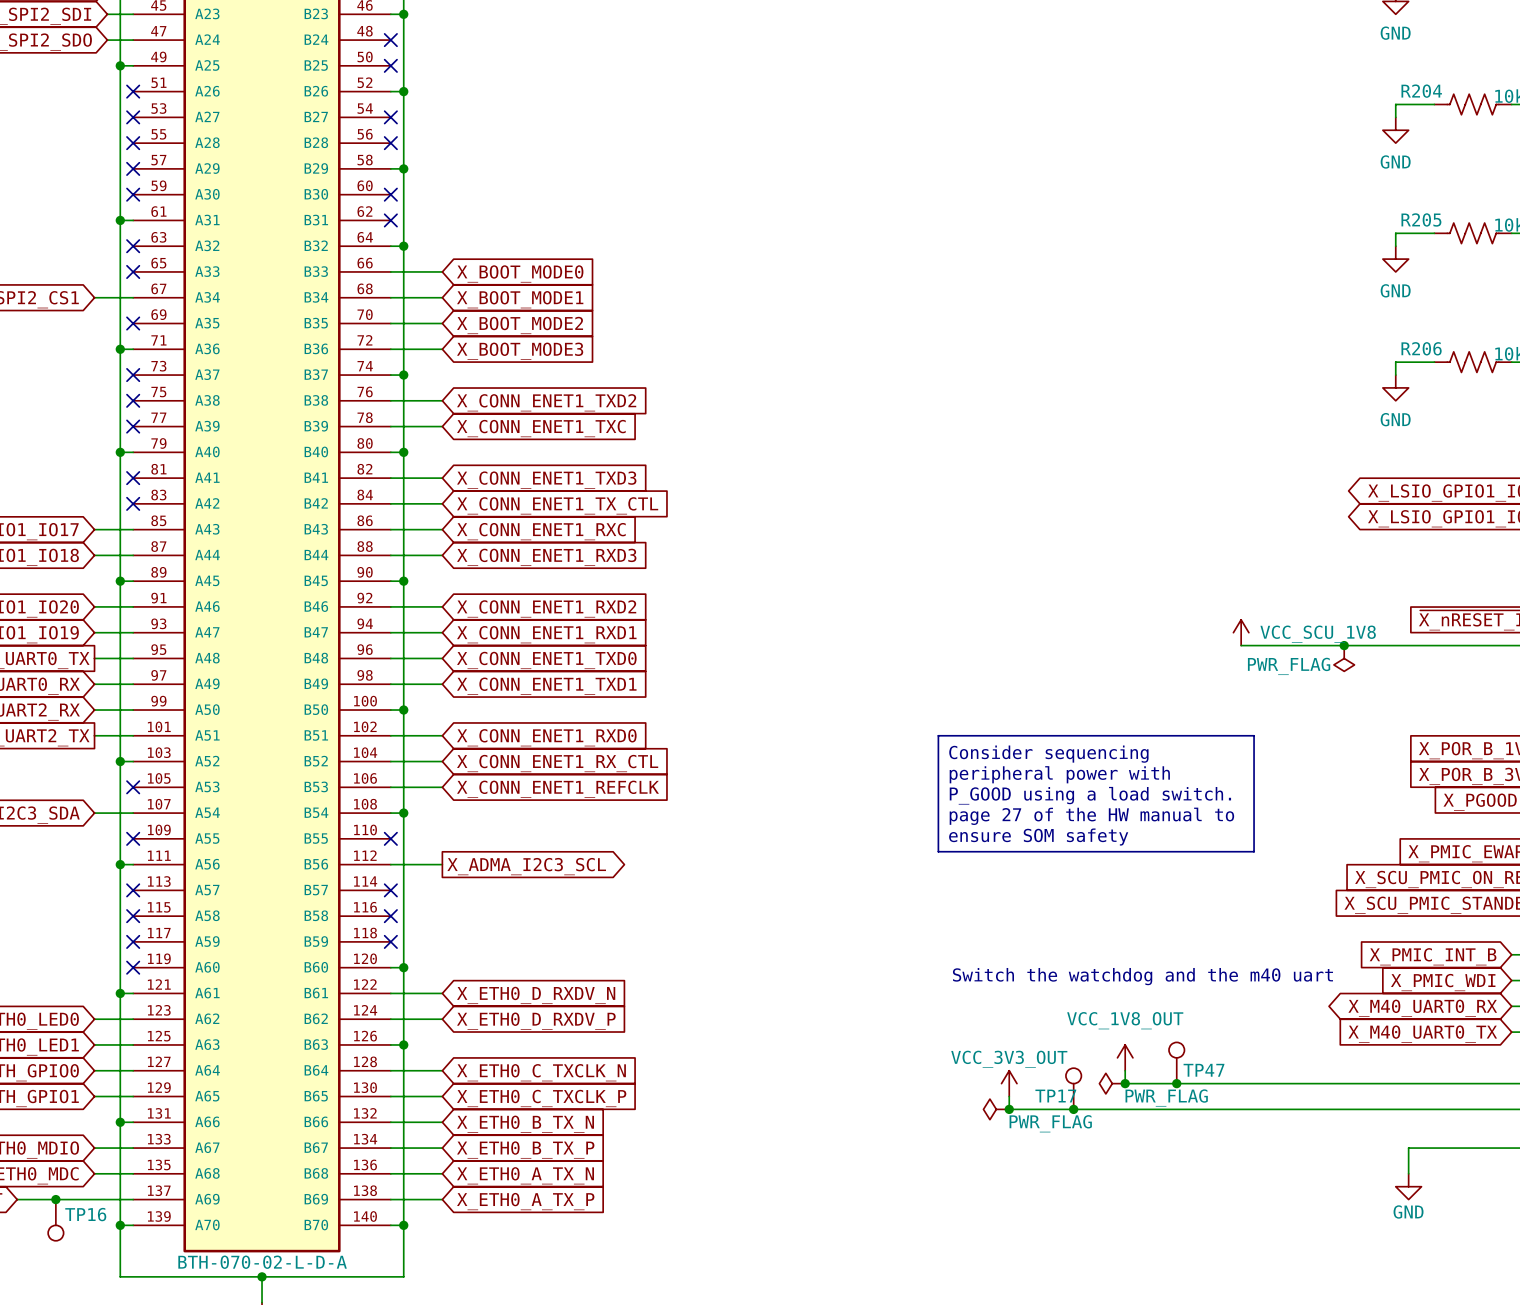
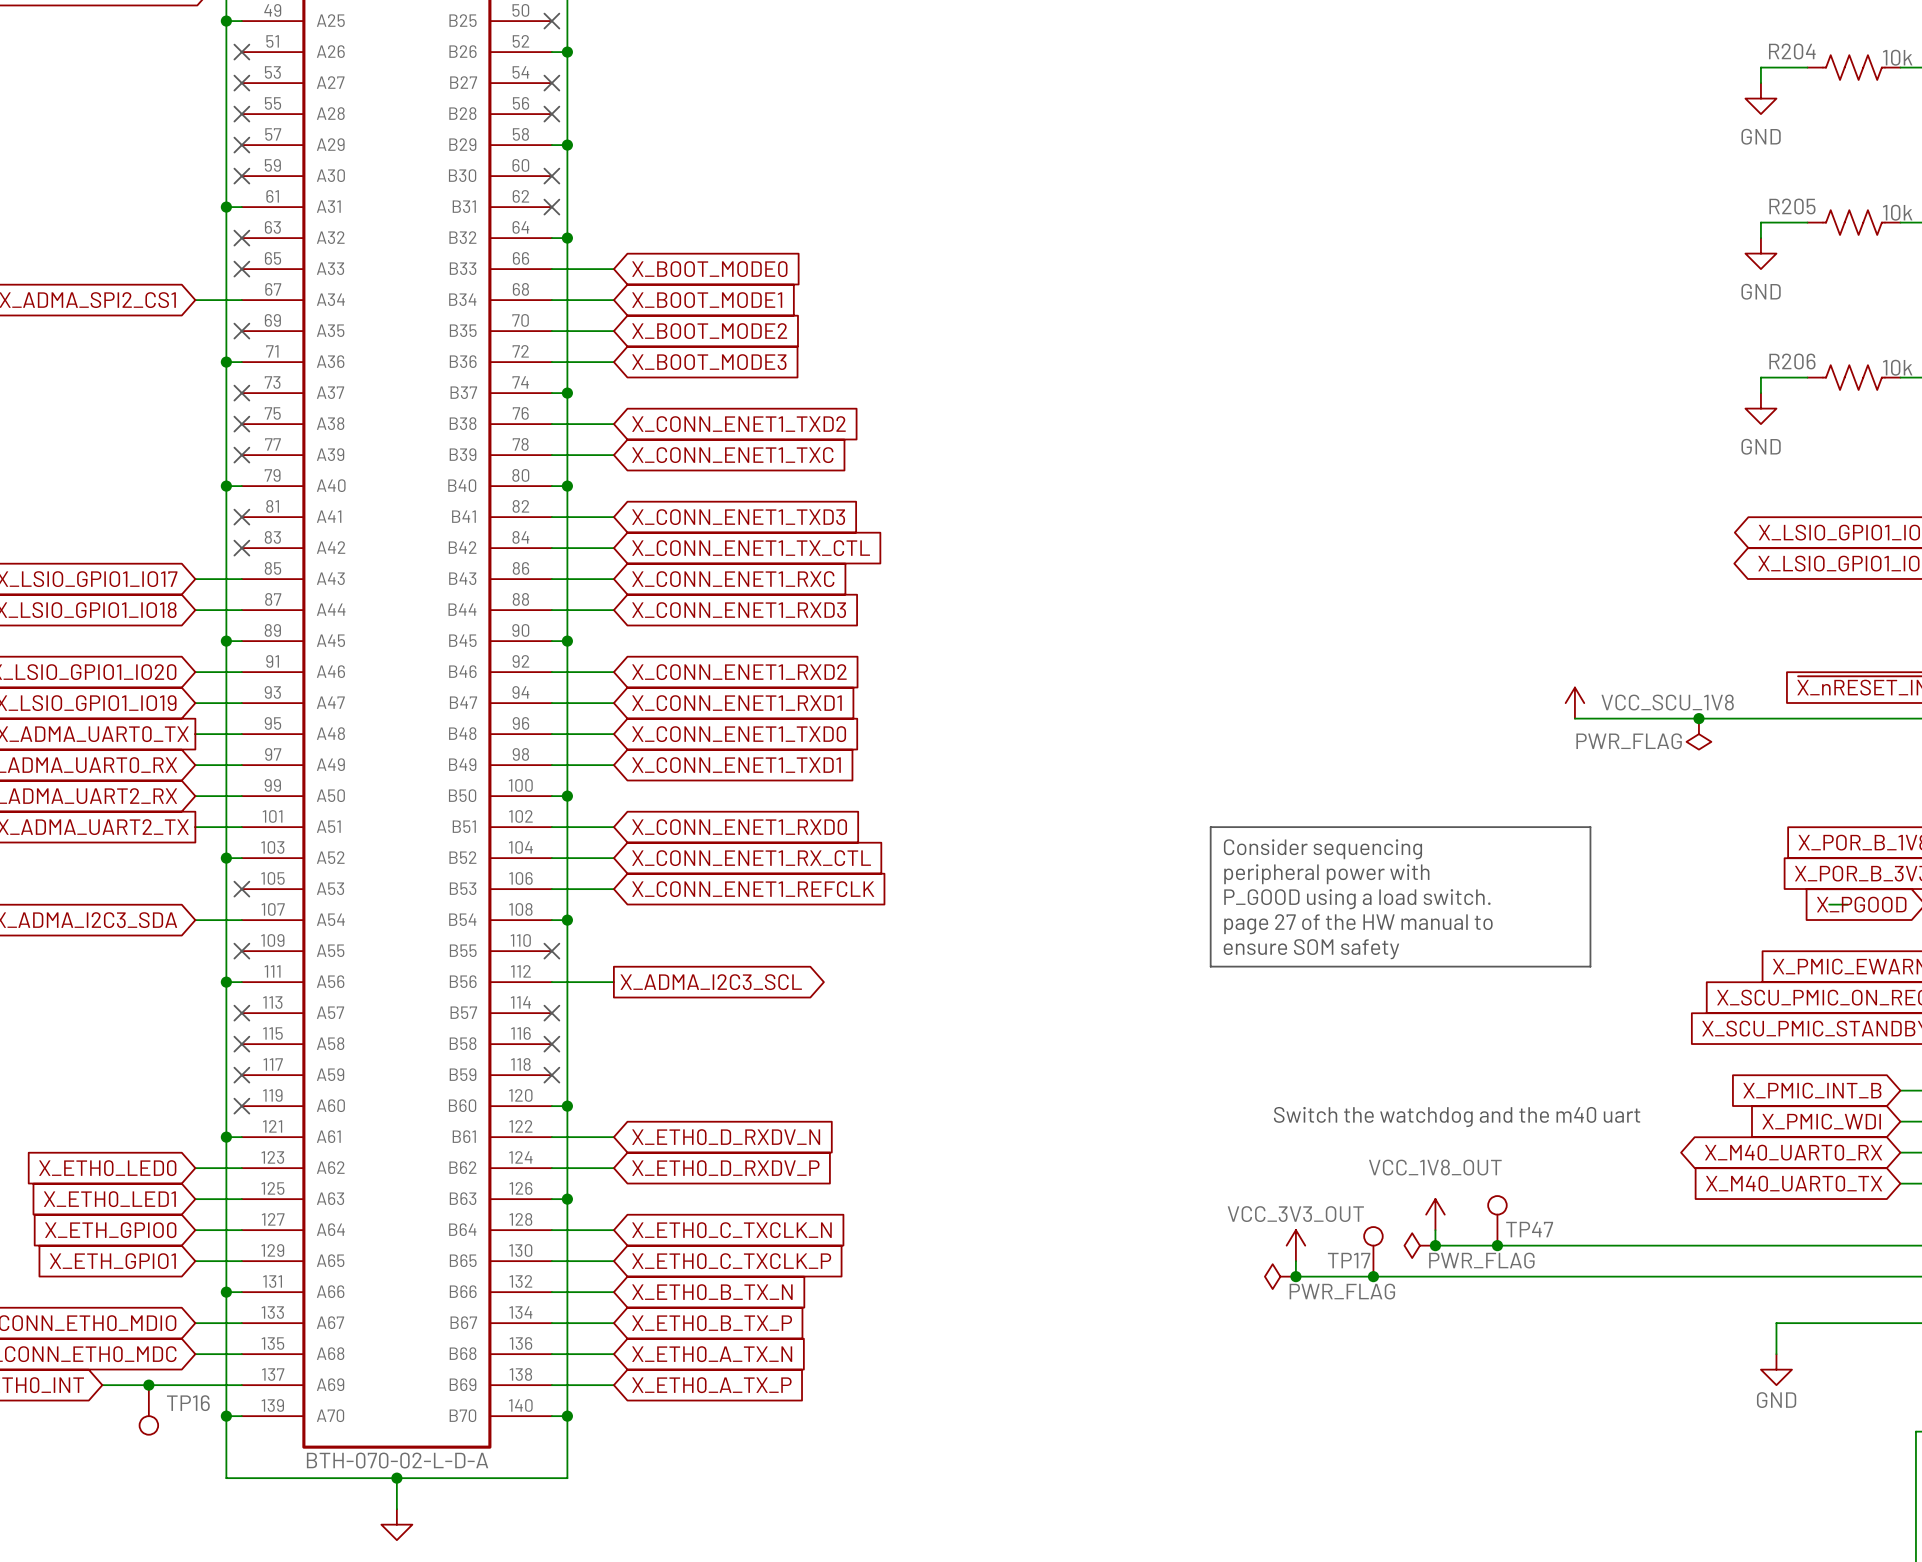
wire: none -> (1829, 904) (1847, 904)

